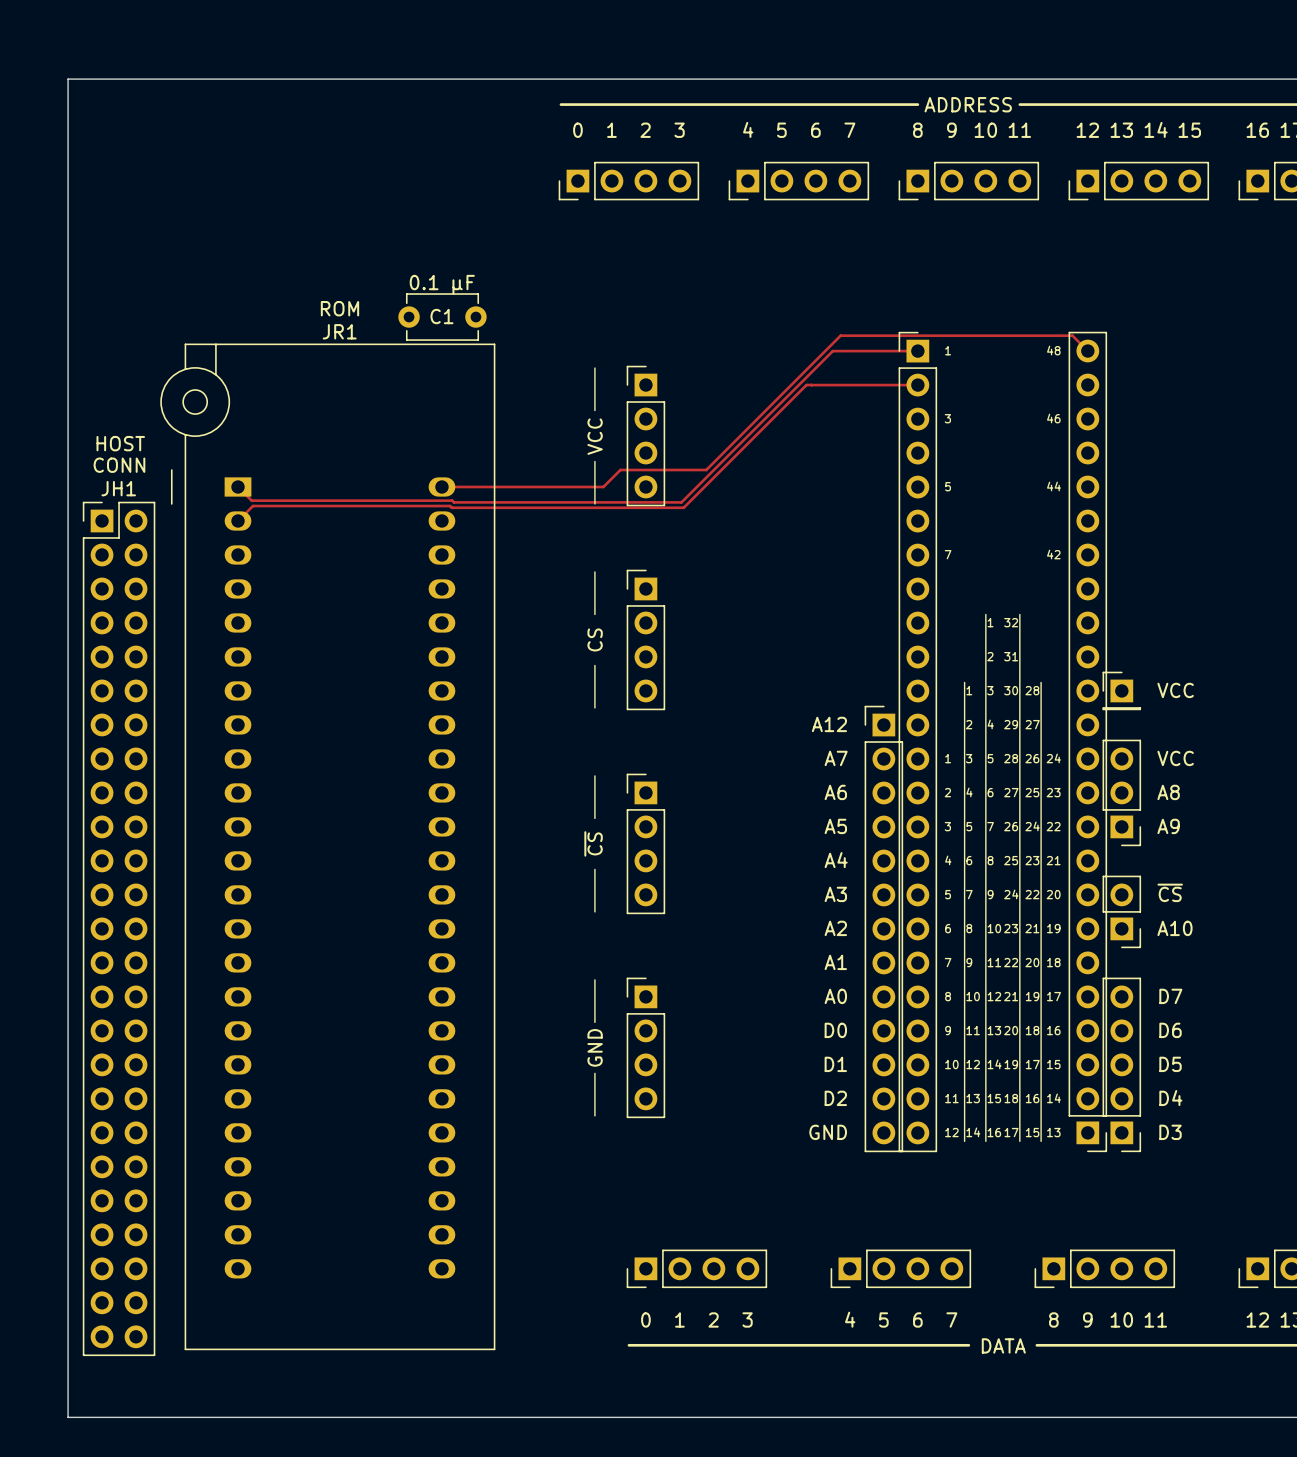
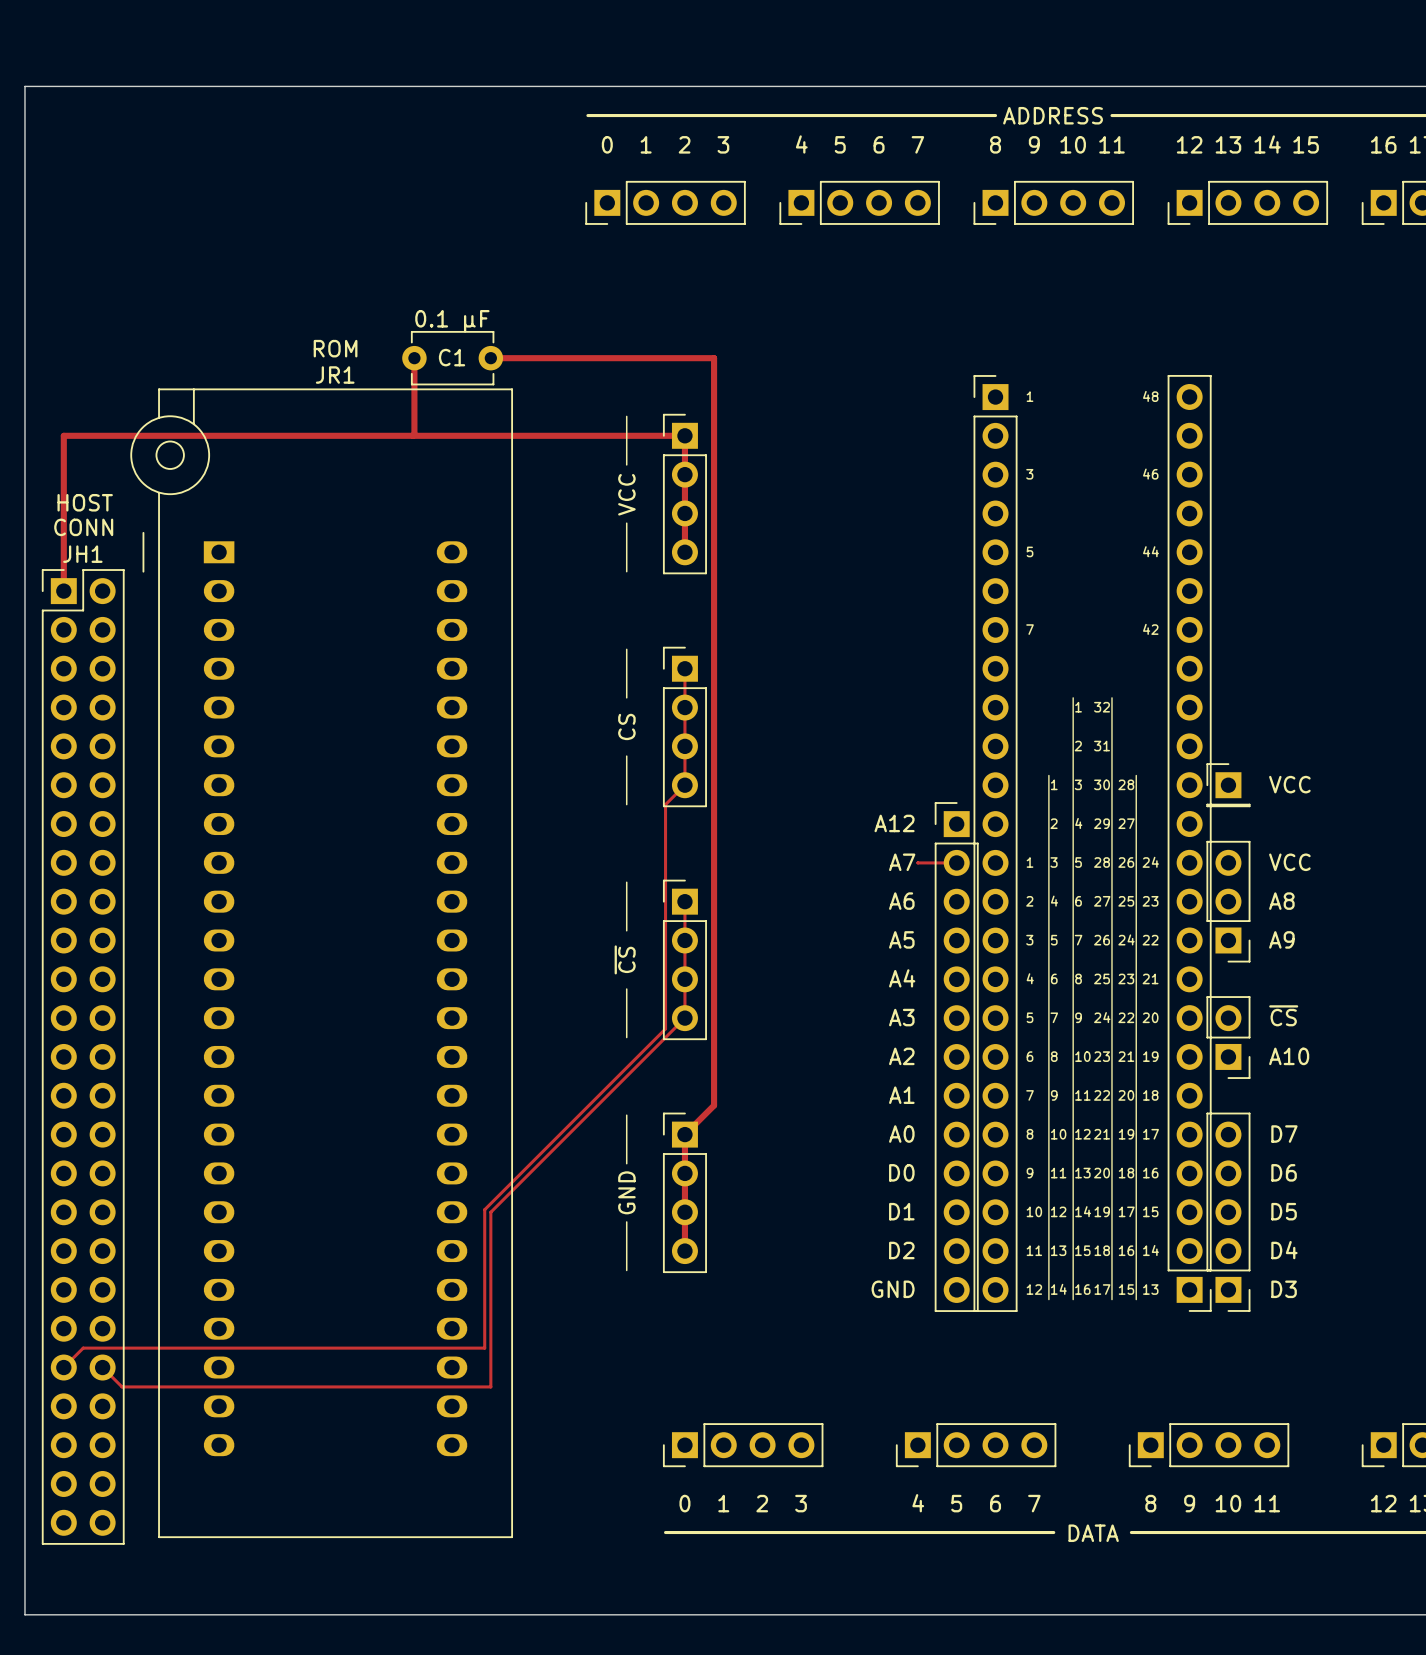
top track: none -> (414, 358) (413, 435)
top track: none -> (490, 358) (714, 358) (714, 1105) (684, 1134) (684, 1251)
top track: (917, 351) (832, 351) (681, 502) (251, 500) (238, 486) -> none
top track: (1087, 351) (1072, 335) (840, 335) (706, 470) (620, 470) (603, 486) (441, 486) -> none
top track: (811, 385) (806, 385) (683, 507) (252, 506) (238, 520) -> none
top track: (811, 385) (917, 385) -> none
top track: none -> (684, 552) (684, 435) (63, 435) (63, 591)
top track: none -> (684, 668) (684, 785) (665, 804) (665, 1028) (484, 1209) (484, 1348) (83, 1348) (63, 1367)
top track: none -> (917, 862) (956, 862)
top track: none -> (684, 901) (684, 1018) (490, 1212) (490, 1386) (122, 1386) (102, 1367)

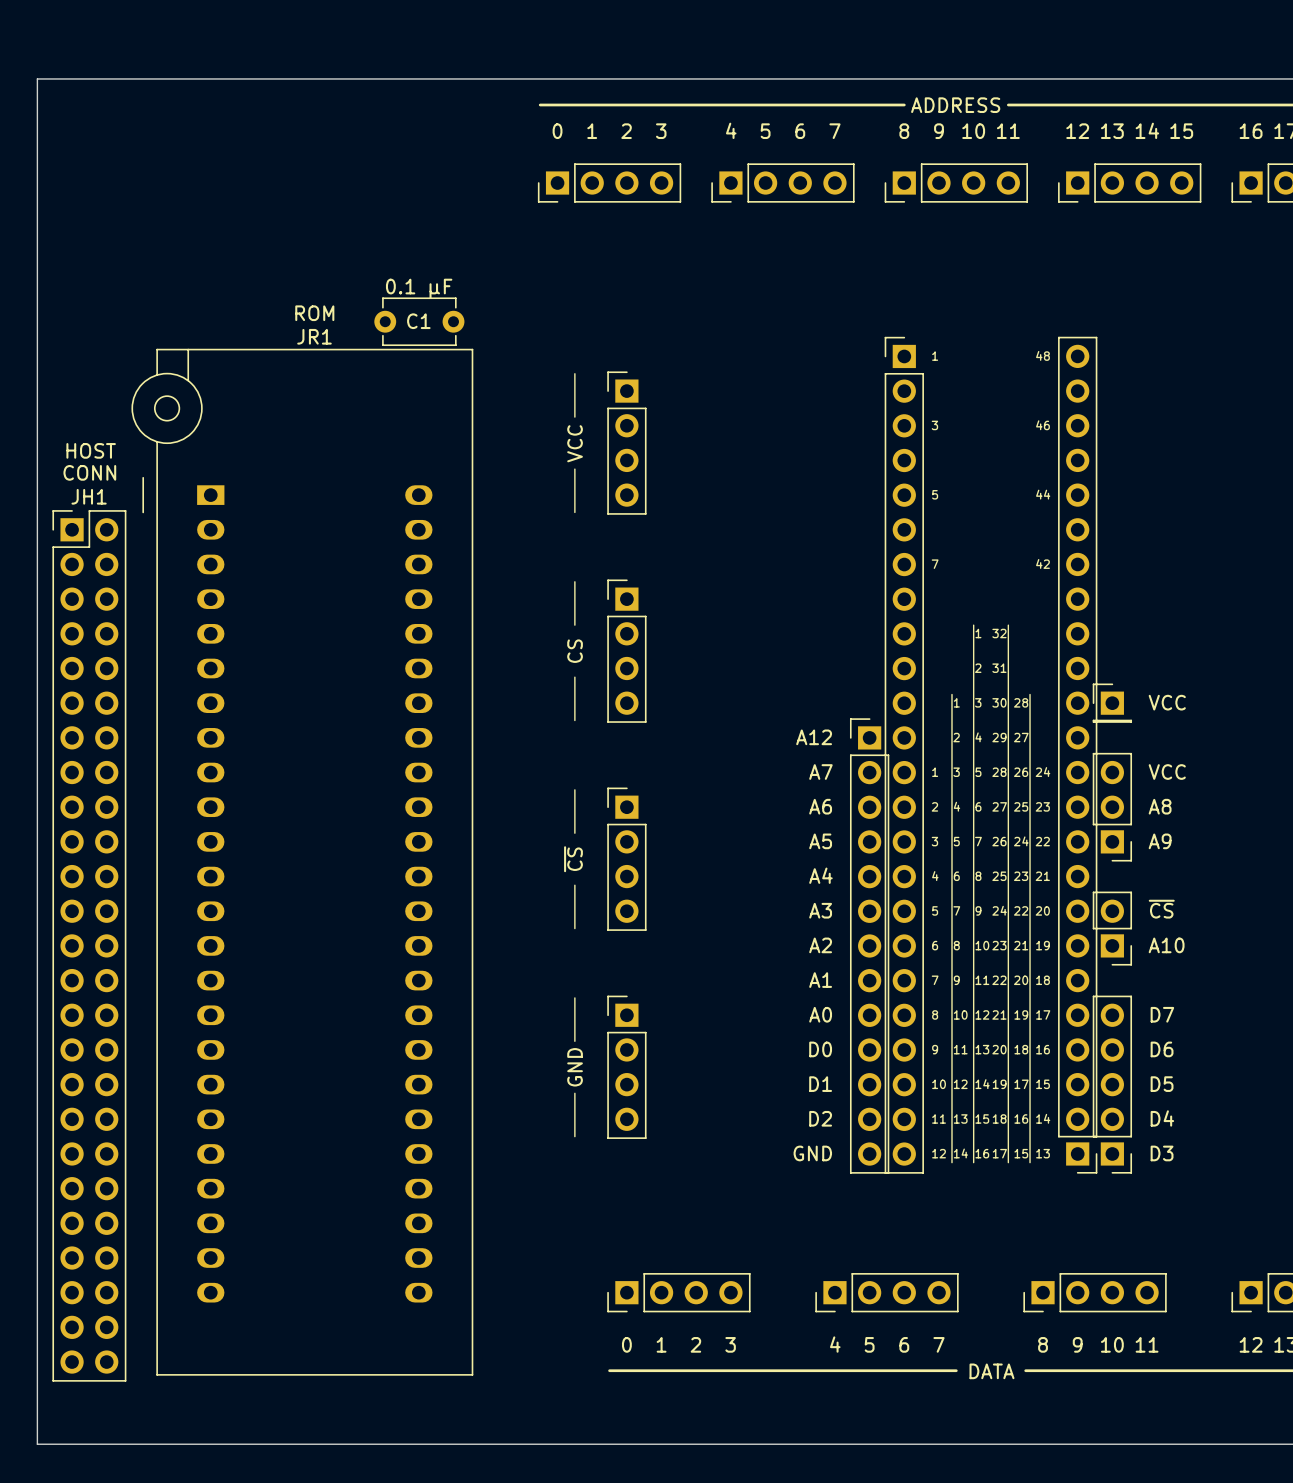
top track: (414, 358) (413, 435) -> none
top track: (490, 358) (714, 358) (714, 1105) (684, 1134) (684, 1251) -> none
top track: (684, 552) (684, 435) (63, 435) (63, 591) -> none
top track: (684, 668) (684, 785) (665, 804) (665, 1028) (484, 1209) (484, 1348) (83, 1348) (63, 1367) -> none
top track: (917, 862) (956, 862) -> none
top track: (684, 901) (684, 1018) (490, 1212) (490, 1386) (122, 1386) (102, 1367) -> none

